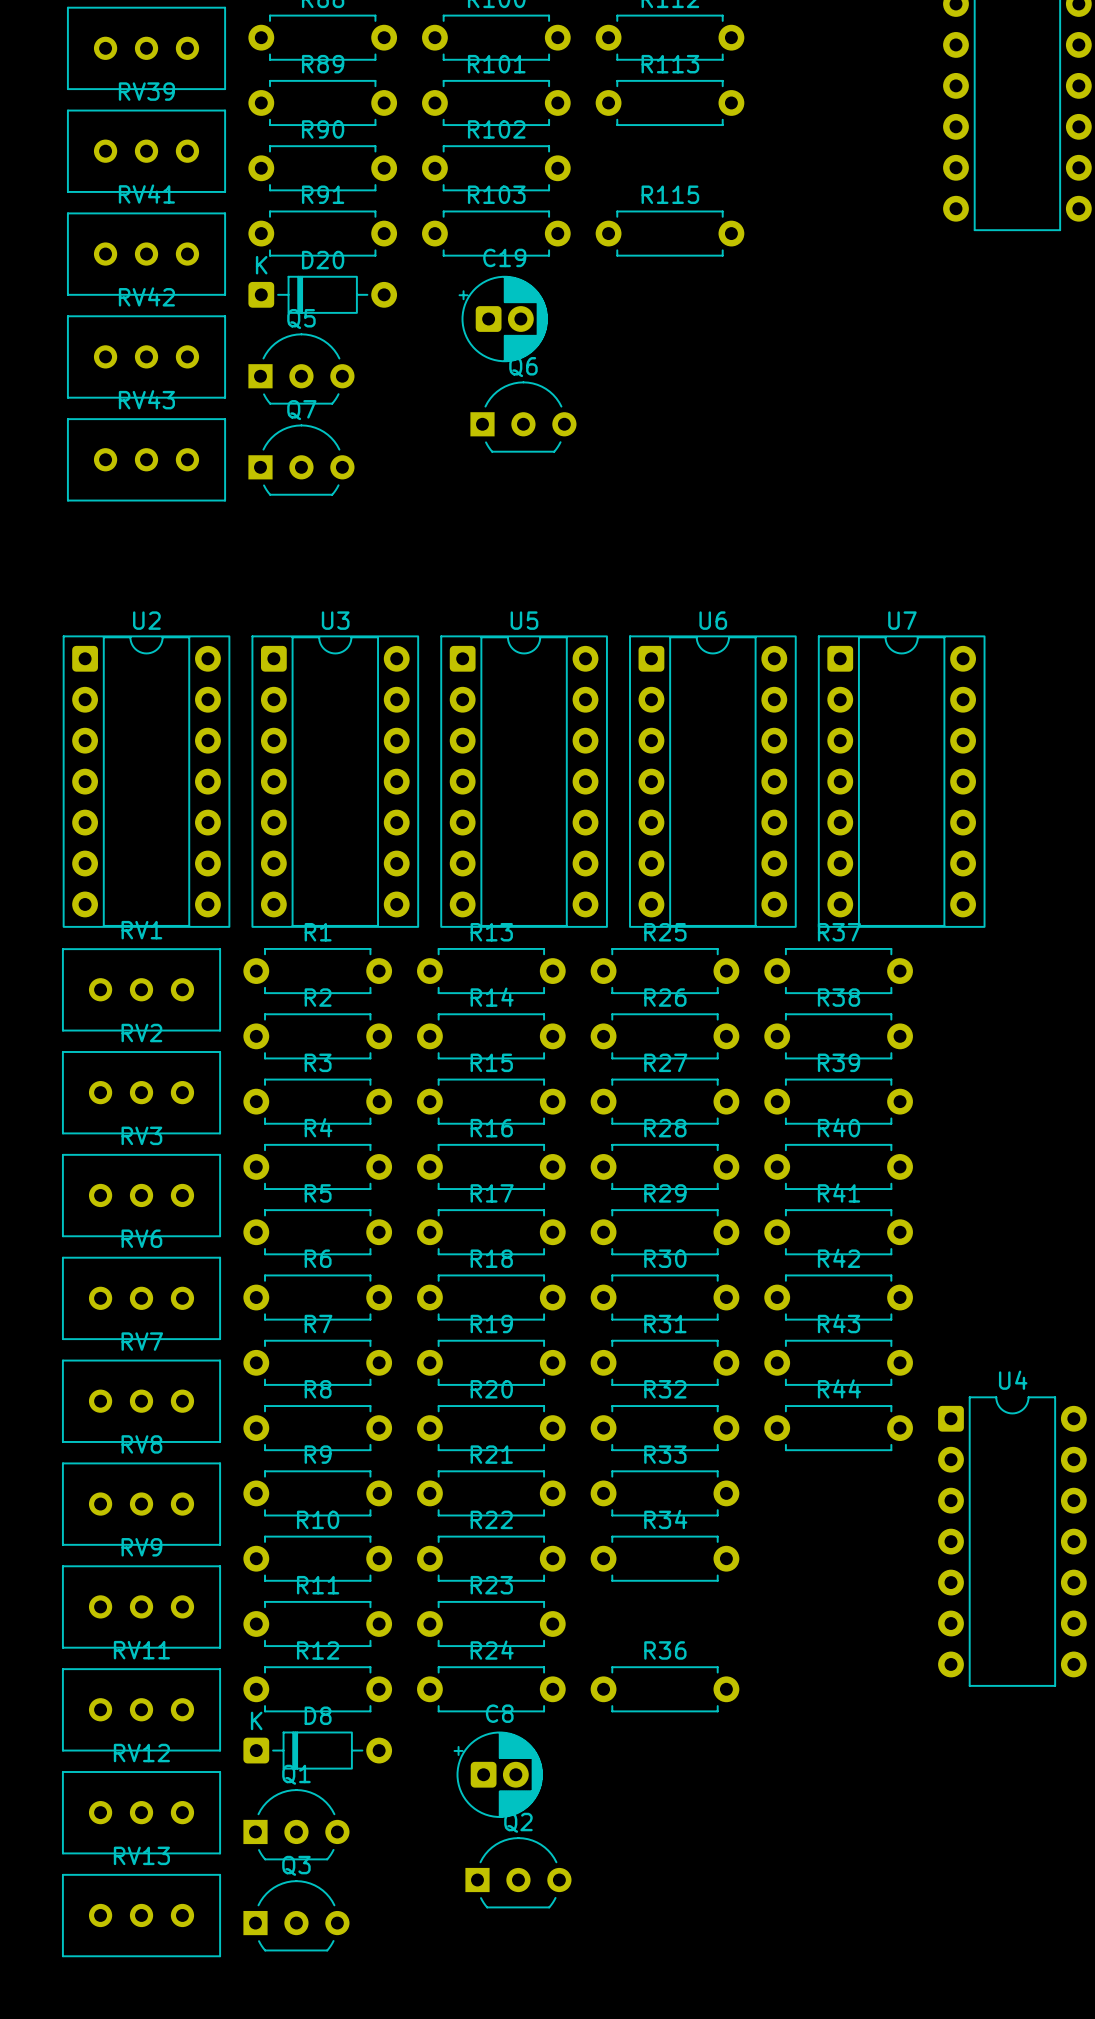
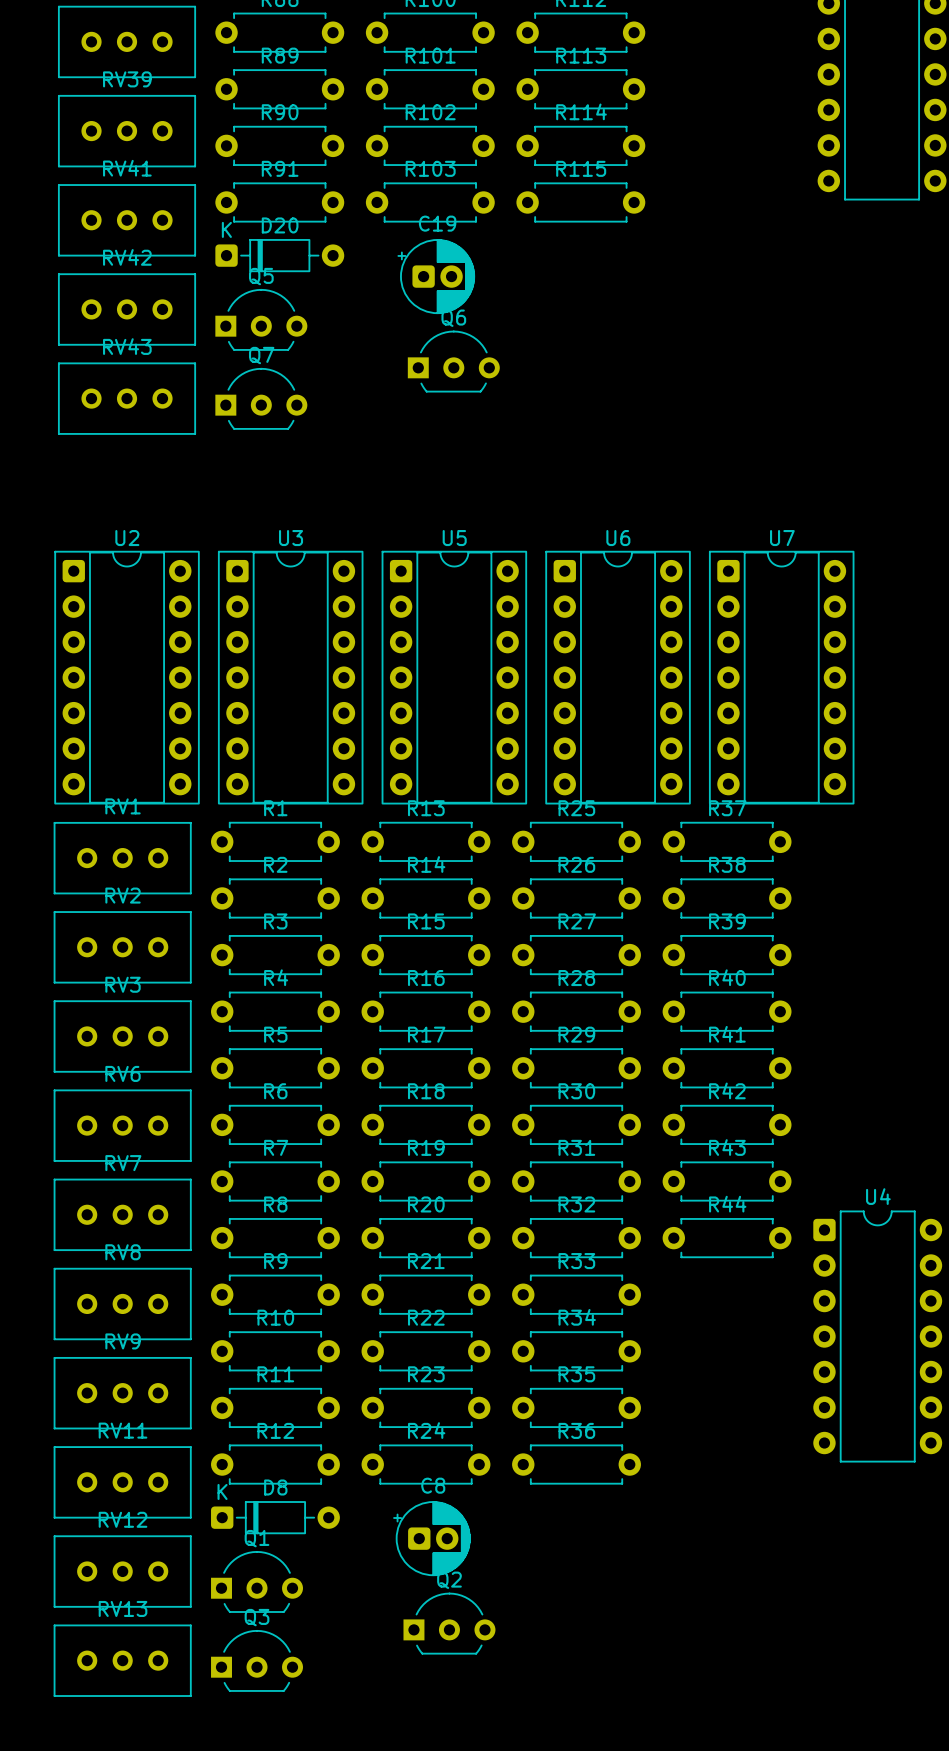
R114: none -> (580, 145)
R35: none -> (576, 1407)

